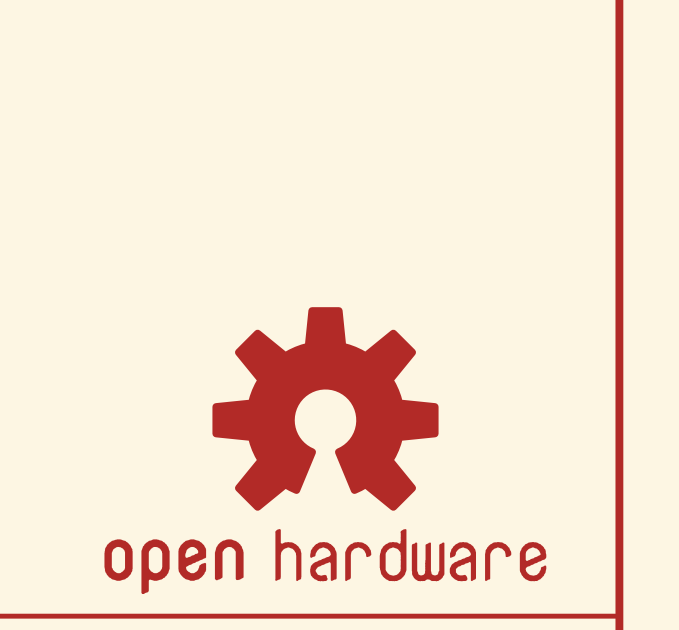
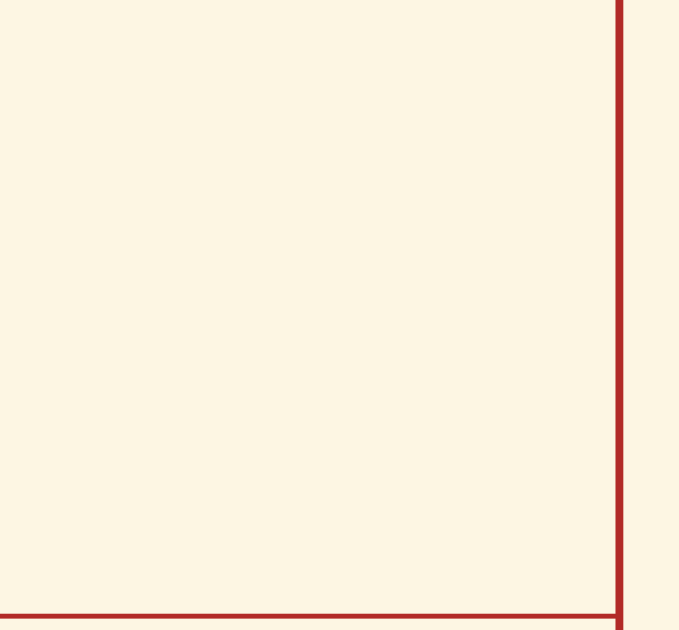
drawing: [212, 307, 547, 582] -> none
drawing: [104, 539, 244, 595] -> none

